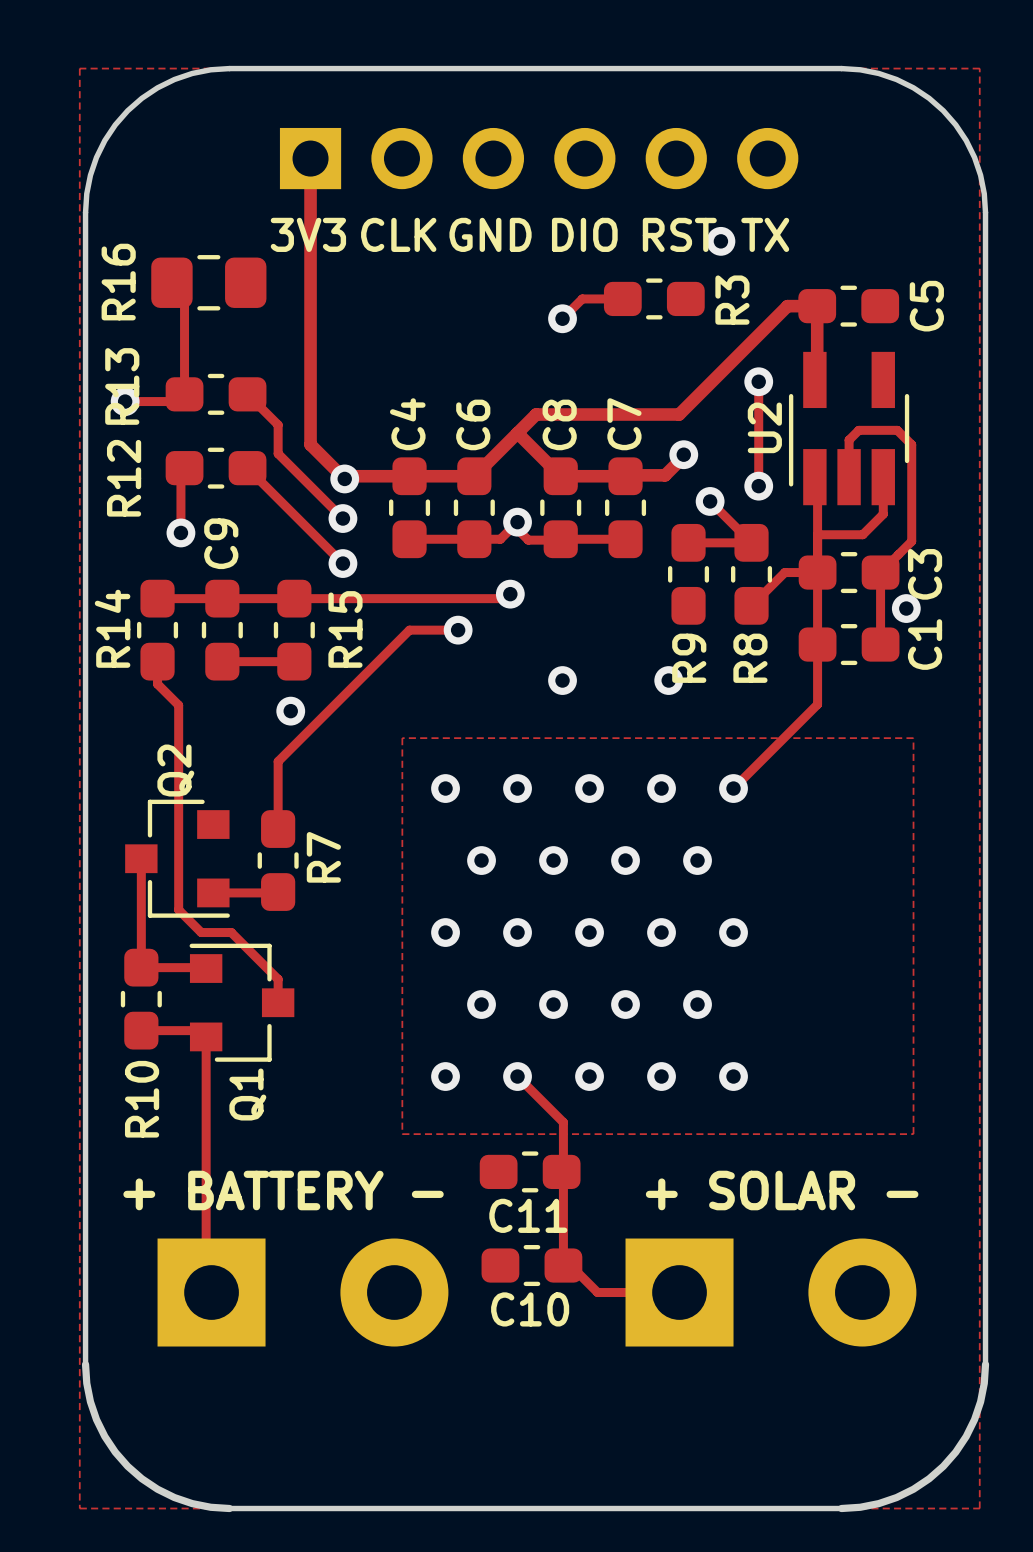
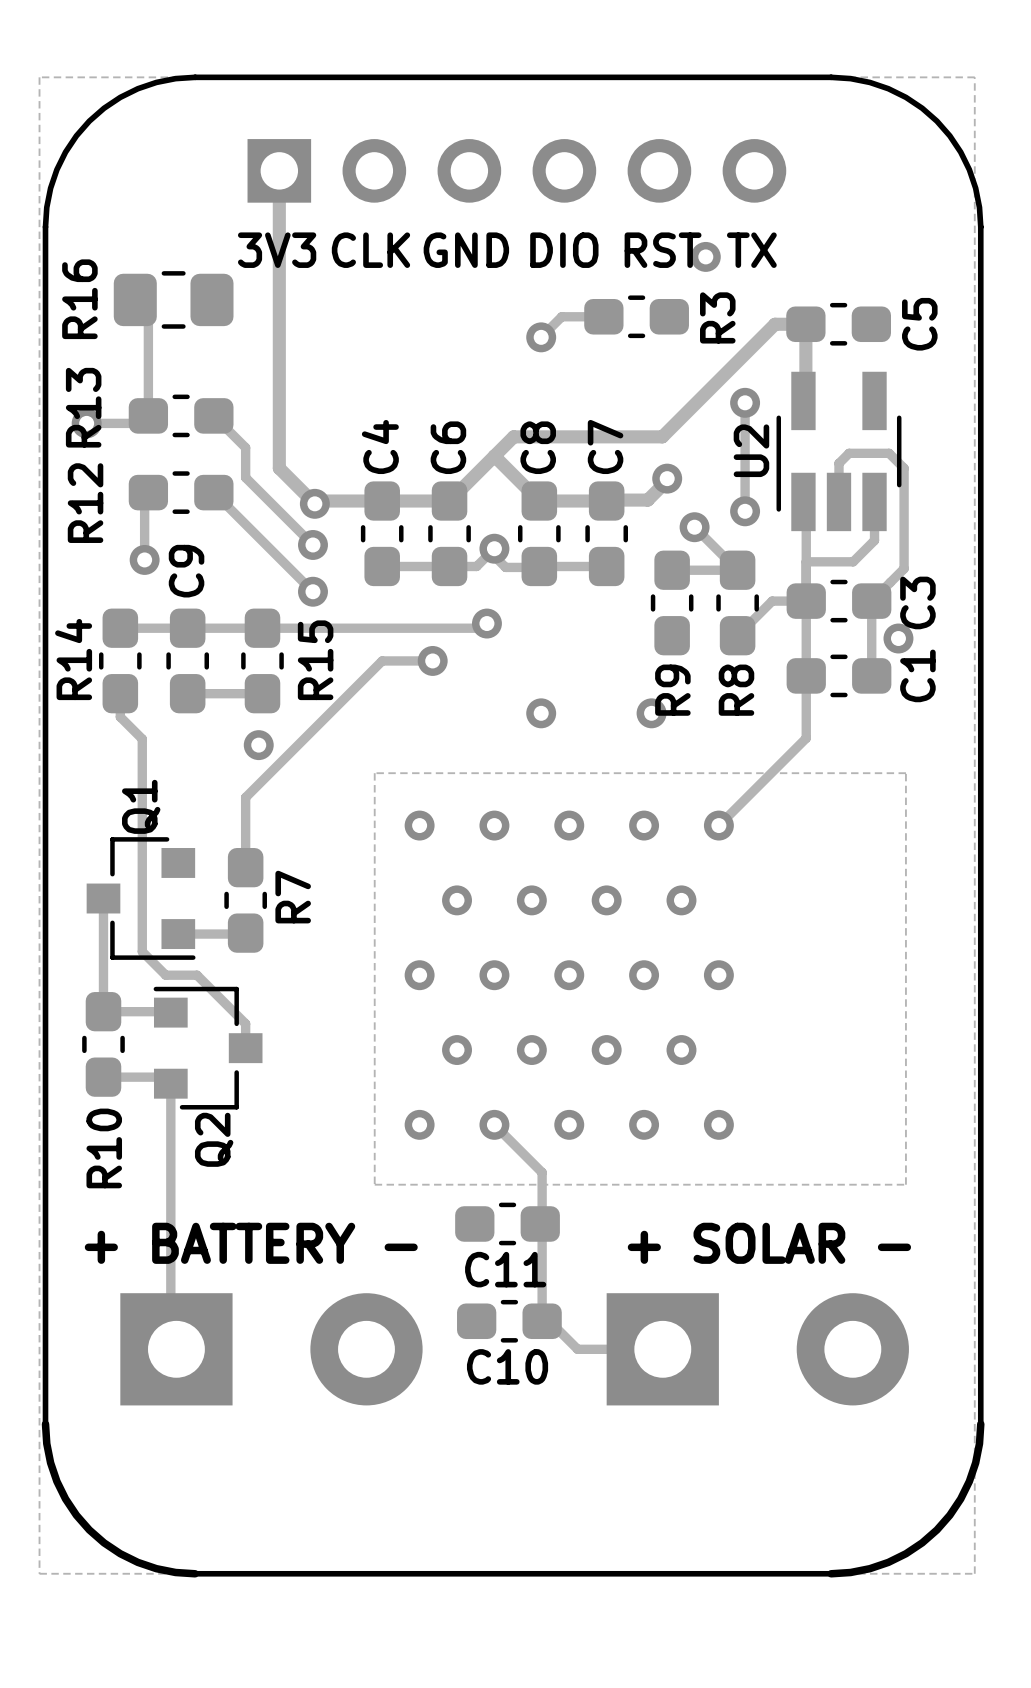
Q2 name position: Q2 (175, 770) -> Q2 (214, 1139)
Q1 name position: Q1 (247, 1094) -> Q1 (141, 806)

